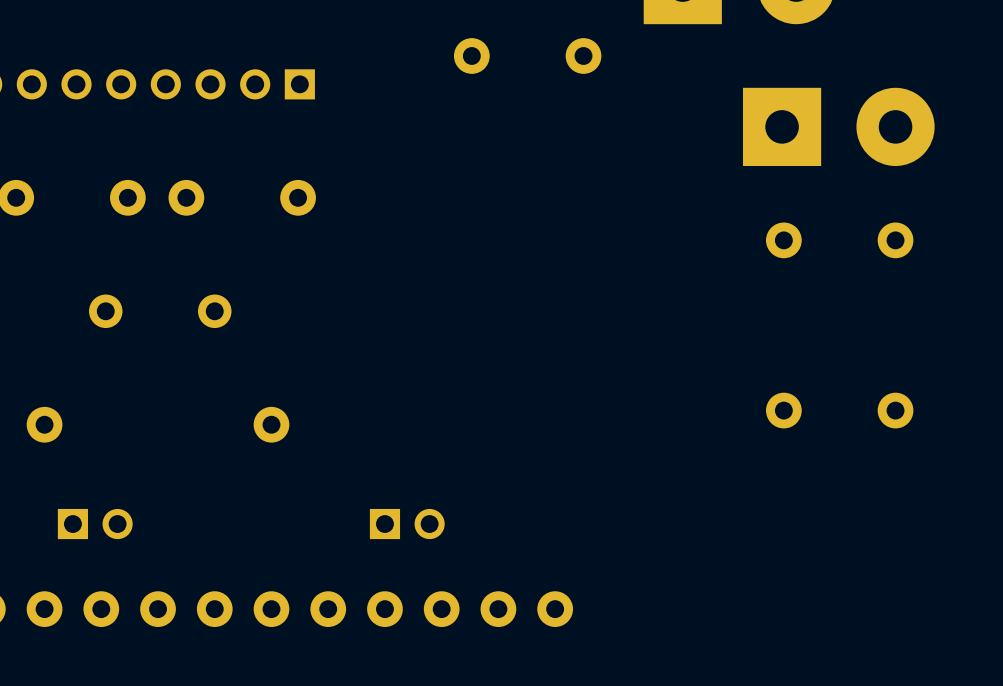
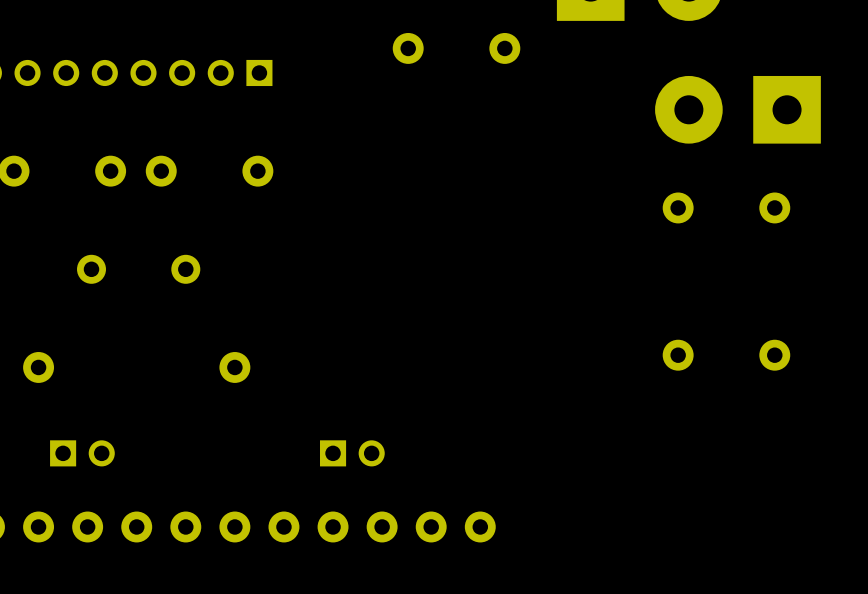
part rotation: 0° (838, 126) -> 180° (737, 109)

